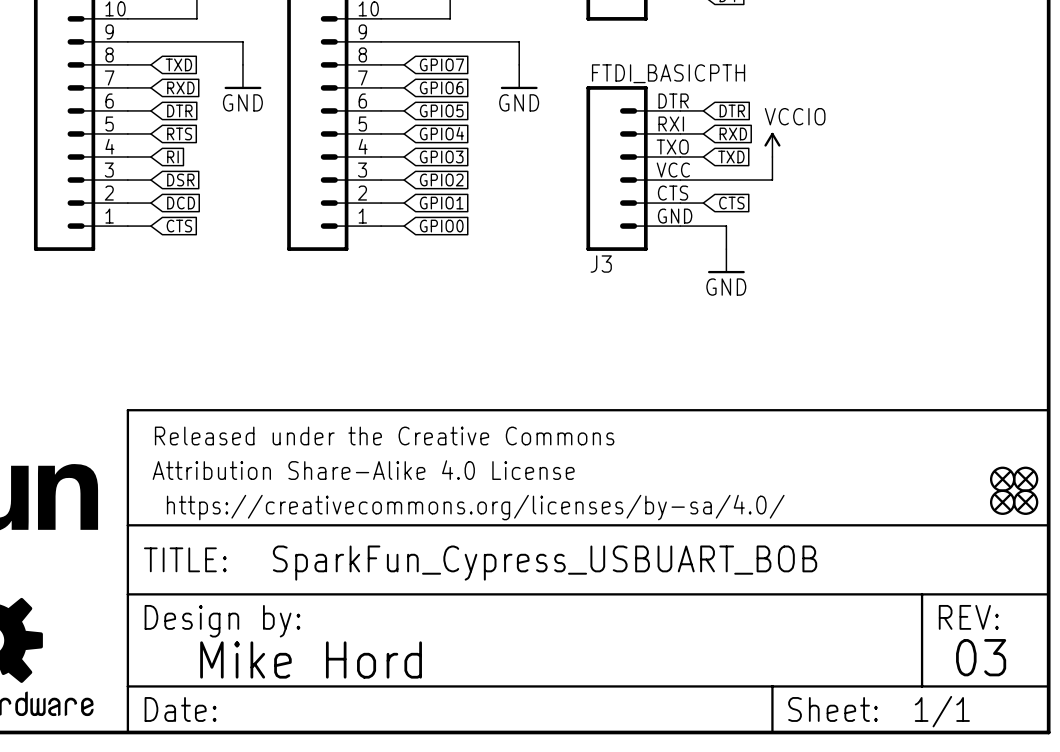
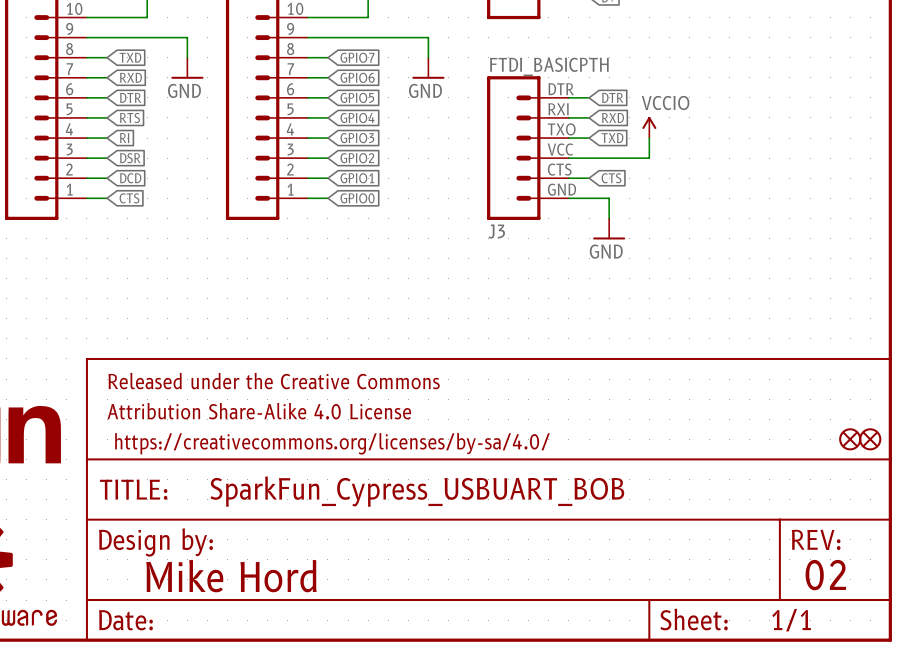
part: (1002, 479) -> none
part: (1025, 479) -> none
text: 03 (981, 657) -> 02 (825, 575)

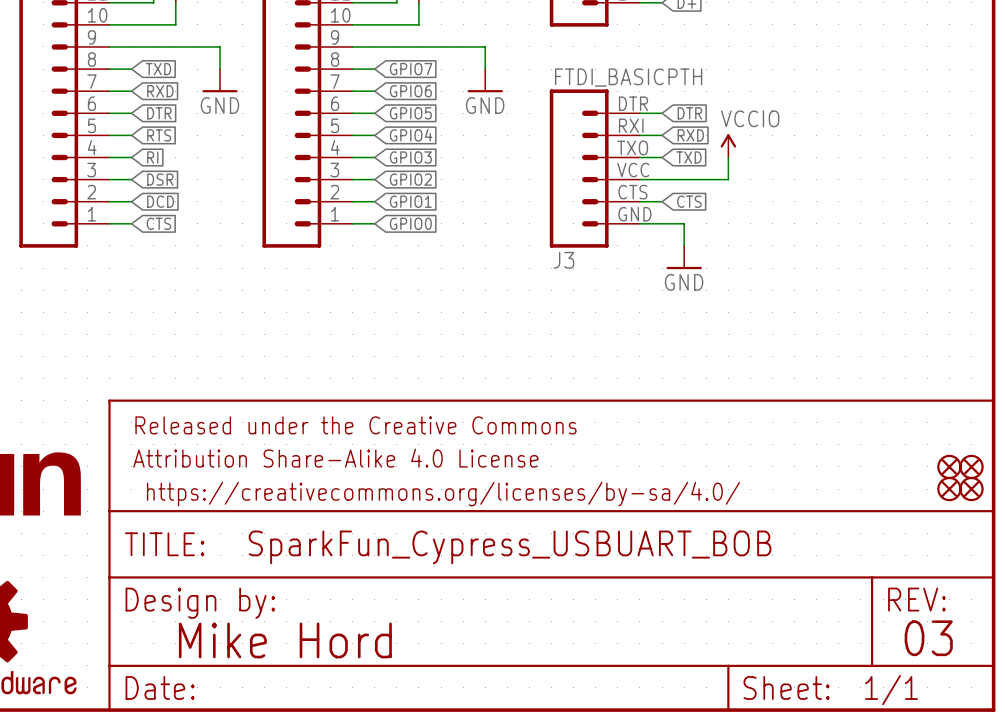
part: none -> (949, 466)
part: none -> (971, 466)
text: 02 (825, 575) -> 03 (928, 638)

